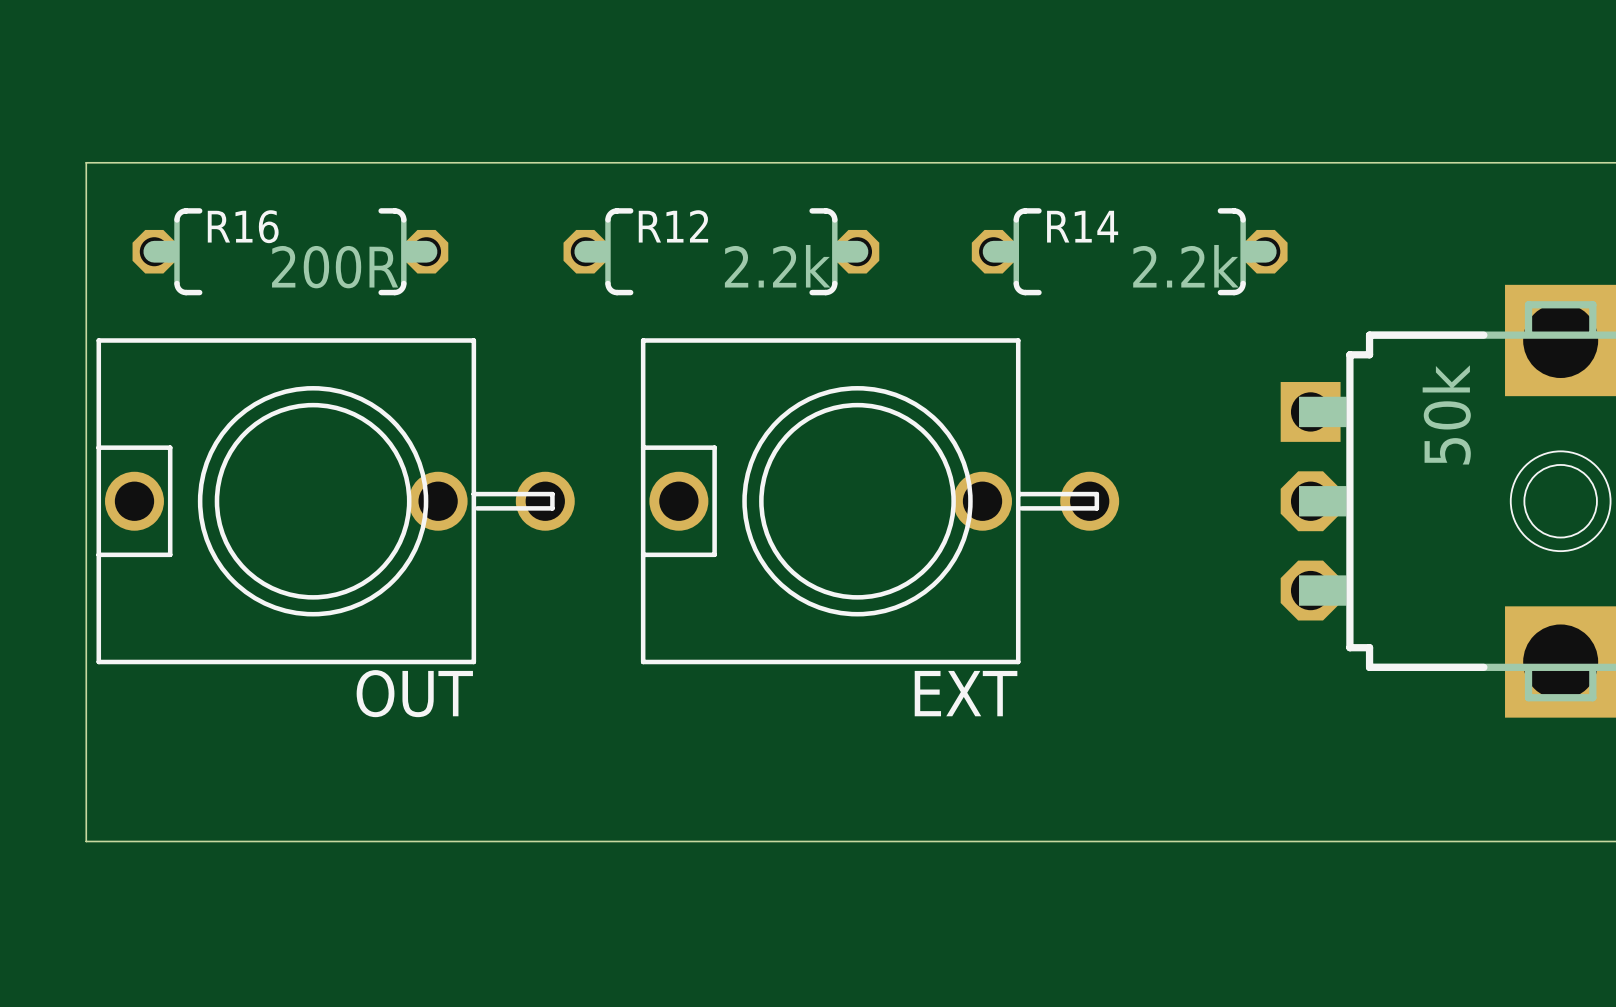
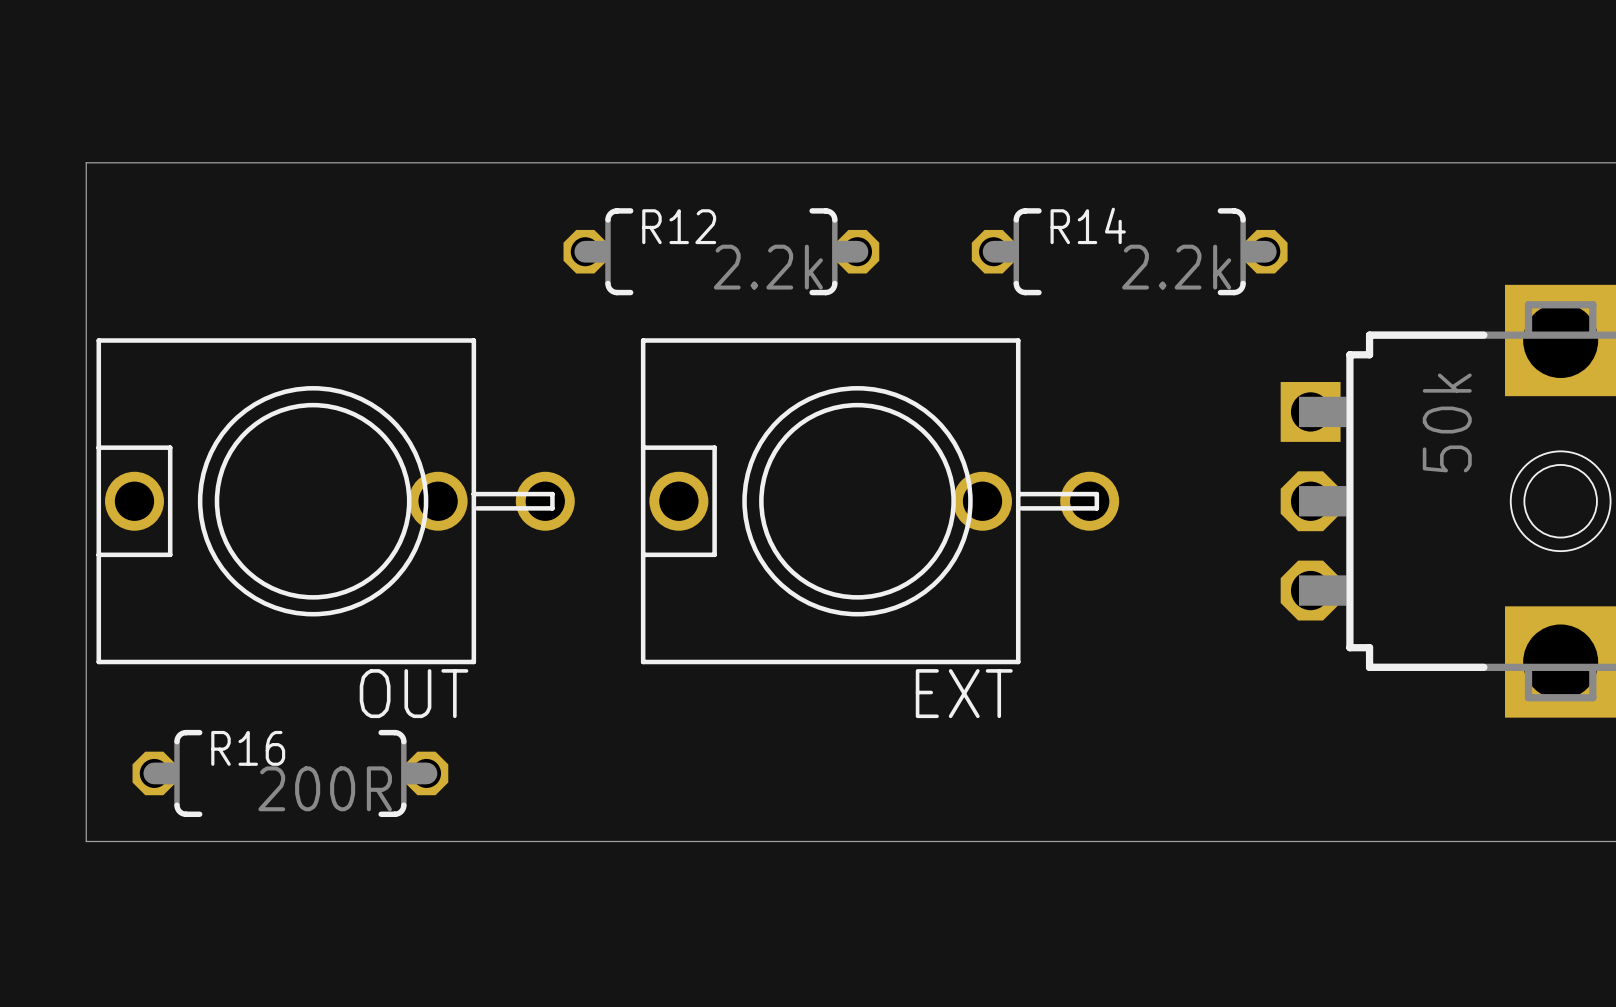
R16 position: (290, 251) -> (290, 773)

